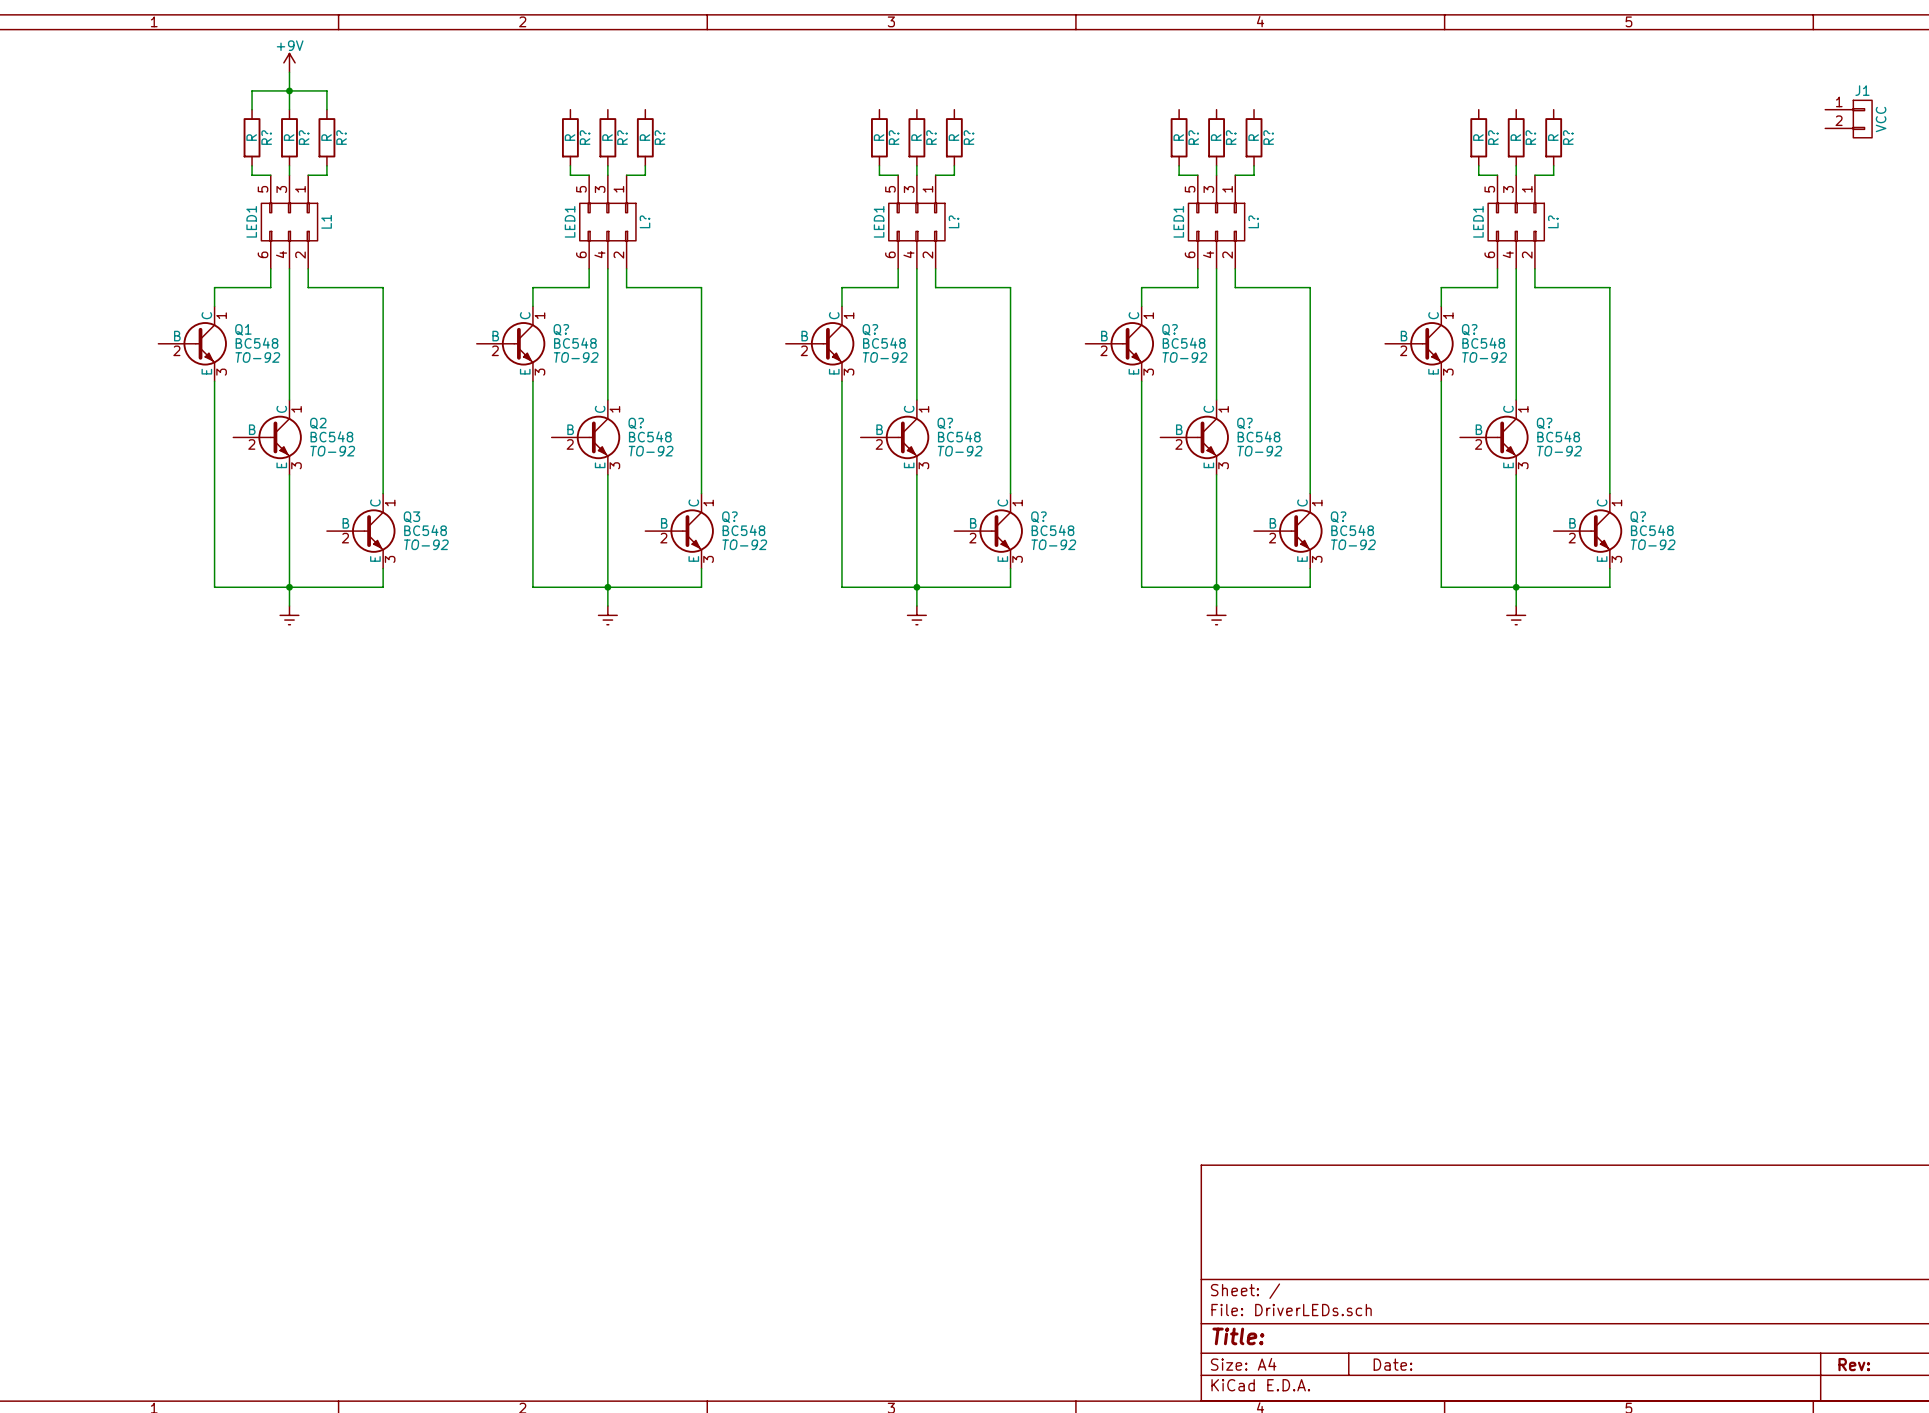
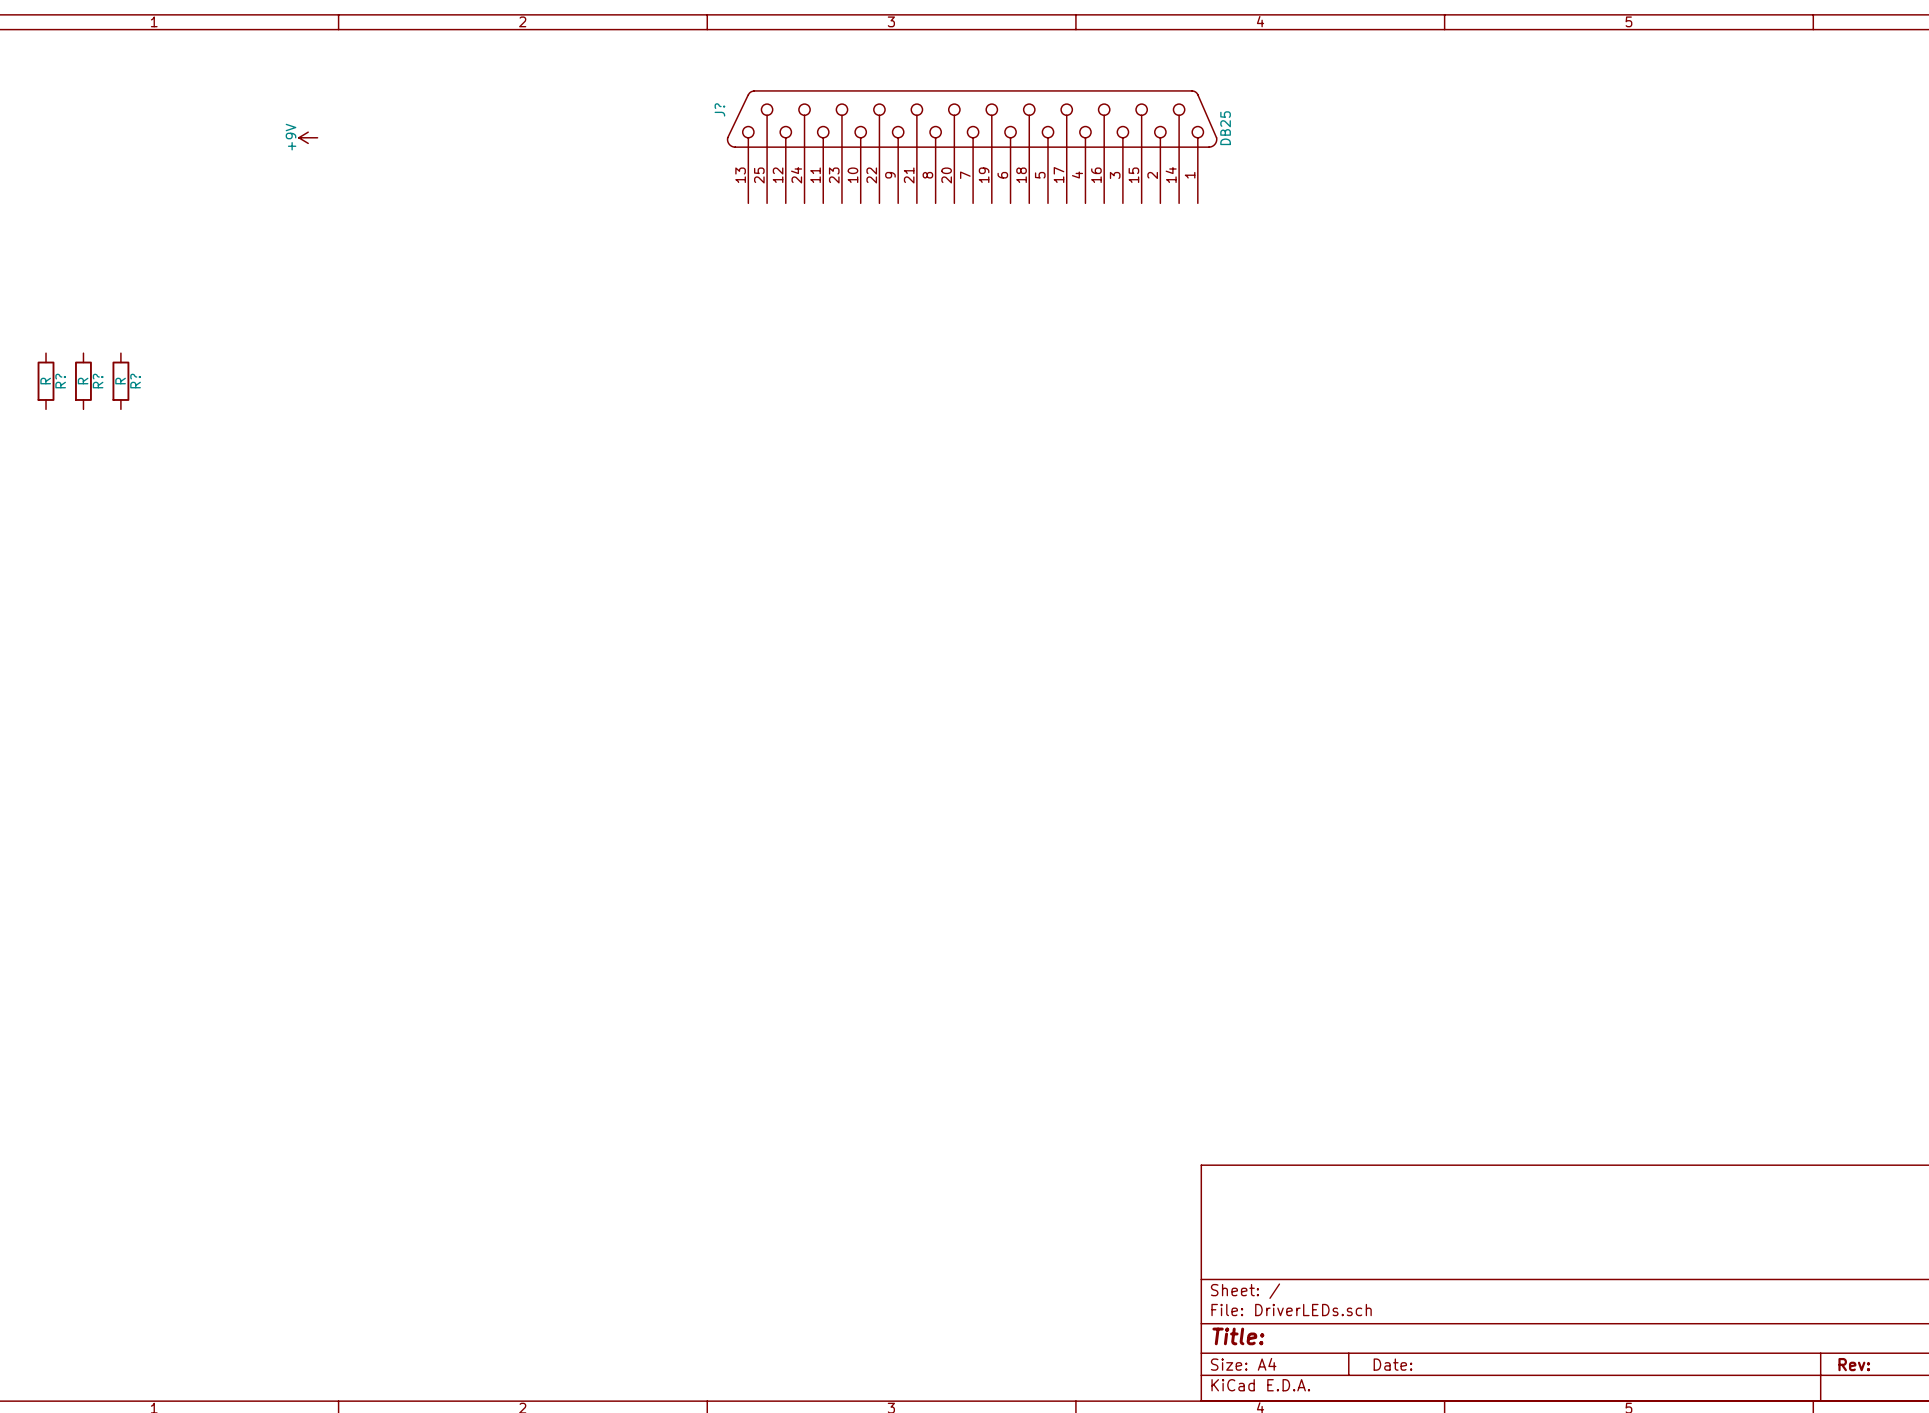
power symbol rotation: 0° (289, 62) -> 90° counterclockwise (308, 137)
power symbol position: +9V (289, 62) -> +9V (308, 137)
wire: (289, 72) (289, 109) -> none
junction: (289, 90) -> none
wire: (252, 109) (252, 90) (326, 90) (326, 109) -> none
J1: VCC (1848, 119) -> none
R?: R (252, 137) -> none
R?: R (289, 137) -> none
R?: R (326, 137) -> none
R?: R (570, 137) -> none
R?: R (607, 137) -> none
R?: R (645, 137) -> none
R?: R (879, 137) -> none
R?: R (916, 137) -> none
R?: R (954, 137) -> none
R?: R (1179, 137) -> none
R?: R (1216, 137) -> none
R?: R (1254, 137) -> none
R?: R (1478, 137) -> none
R?: R (1516, 137) -> none
R?: R (1553, 137) -> none
J?: none -> DB25 (972, 146)
wire: (252, 165) (252, 175) (270, 175) -> none
wire: (289, 165) (289, 175) -> none
wire: (326, 165) (326, 175) (308, 175) -> none
wire: (570, 165) (570, 175) (589, 175) -> none
wire: (607, 165) (607, 175) -> none
wire: (645, 165) (645, 175) (626, 175) -> none
wire: (1216, 165) (1216, 175) -> none
wire: (1254, 165) (1254, 175) (1235, 175) -> none
wire: (1478, 165) (1478, 175) (1497, 175) -> none
wire: (1516, 165) (1516, 175) -> none
wire: (1553, 165) (1553, 175) (1534, 175) -> none
L1: LED1 (289, 222) -> none
L?: LED1 (607, 222) -> none
L?: LED1 (916, 222) -> none
L?: LED1 (1216, 222) -> none
L?: LED1 (1516, 222) -> none
wire: (270, 268) (270, 287) (214, 287) (214, 306) -> none
wire: (289, 268) (289, 399) -> none
wire: (308, 268) (308, 287) (383, 287) (383, 493) -> none
wire: (589, 268) (589, 287) (532, 287) (532, 306) -> none
wire: (607, 268) (607, 399) -> none
wire: (626, 268) (626, 287) (701, 287) (701, 493) -> none
wire: (898, 268) (898, 287) (841, 287) (841, 306) -> none
wire: (916, 268) (916, 399) -> none
wire: (935, 268) (935, 287) (1010, 287) (1010, 493) -> none
wire: (1197, 268) (1197, 287) (1141, 287) (1141, 306) -> none
wire: (1216, 268) (1216, 399) -> none
wire: (1235, 268) (1235, 287) (1310, 287) (1310, 493) -> none
wire: (1497, 268) (1497, 287) (1441, 287) (1441, 306) -> none
wire: (1516, 268) (1516, 399) -> none
wire: (1534, 268) (1534, 287) (1609, 287) (1609, 493) -> none
Q1: BC548 (192, 343) -> none
Q?: BC548 (511, 343) -> none
Q?: BC548 (820, 343) -> none
Q?: BC548 (1119, 343) -> none
Q?: BC548 (1419, 343) -> none
R?: none -> R (46, 381)
R?: none -> R (83, 381)
R?: none -> R (120, 381)
wire: (214, 381) (214, 587) (383, 587) (383, 568) -> none
wire: (532, 381) (532, 587) (701, 587) (701, 568) -> none
wire: (841, 381) (841, 587) (1010, 587) (1010, 568) -> none
wire: (1141, 381) (1141, 587) (1310, 587) (1310, 568) -> none
wire: (1441, 381) (1441, 587) (1609, 587) (1609, 568) -> none
Q2: BC548 (267, 437) -> none
Q?: BC548 (585, 437) -> none
Q?: BC548 (894, 437) -> none
Q?: BC548 (1194, 437) -> none
Q?: BC548 (1494, 437) -> none
wire: (289, 474) (289, 606) -> none
wire: (607, 474) (607, 606) -> none
wire: (916, 474) (916, 606) -> none
wire: (1216, 474) (1216, 606) -> none
wire: (1516, 474) (1516, 606) -> none
Q3: BC548 (361, 531) -> none
Q?: BC548 (679, 531) -> none
Q?: BC548 (988, 531) -> none
Q?: BC548 (1288, 531) -> none
Q?: BC548 (1587, 531) -> none
junction: (289, 587) -> none
junction: (607, 587) -> none
junction: (916, 587) -> none
junction: (1216, 587) -> none
junction: (1516, 587) -> none
power symbol: (289, 615) -> none
power symbol: (607, 615) -> none
power symbol: (916, 615) -> none
power symbol: (1216, 615) -> none
power symbol: (1516, 615) -> none

